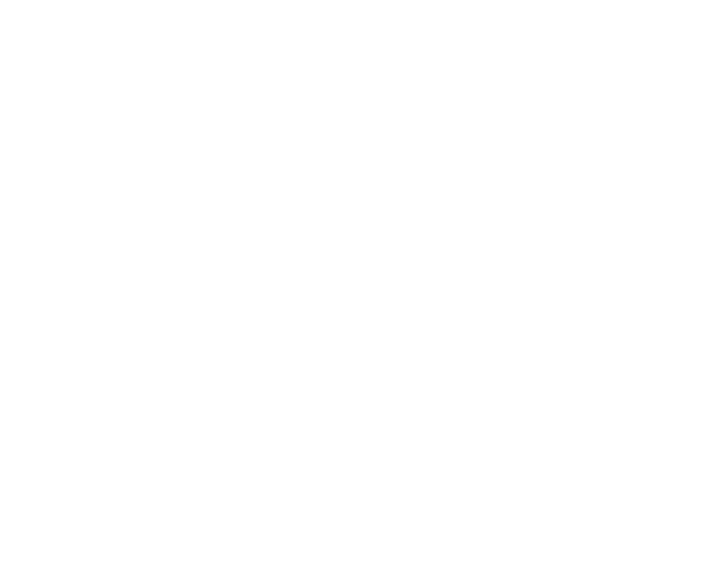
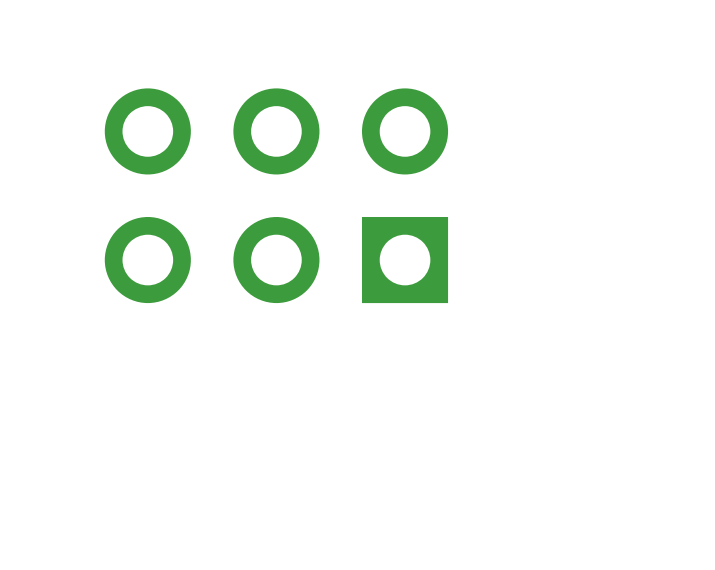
part: none -> (276, 195)

